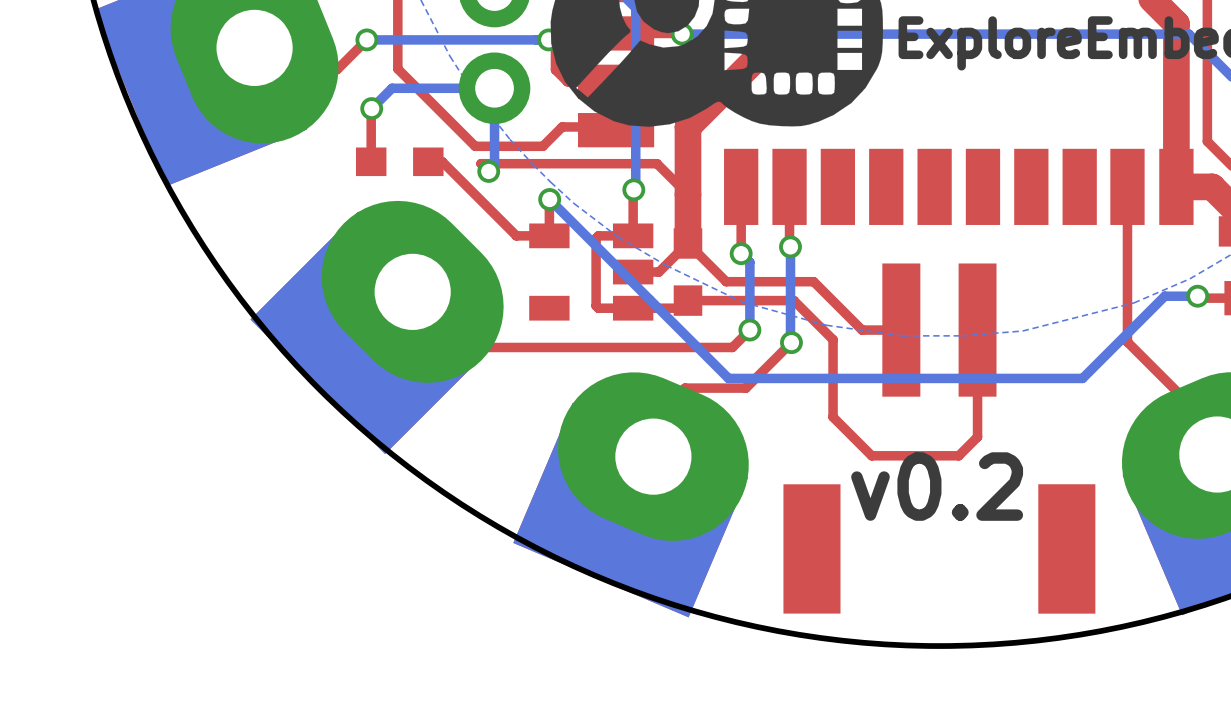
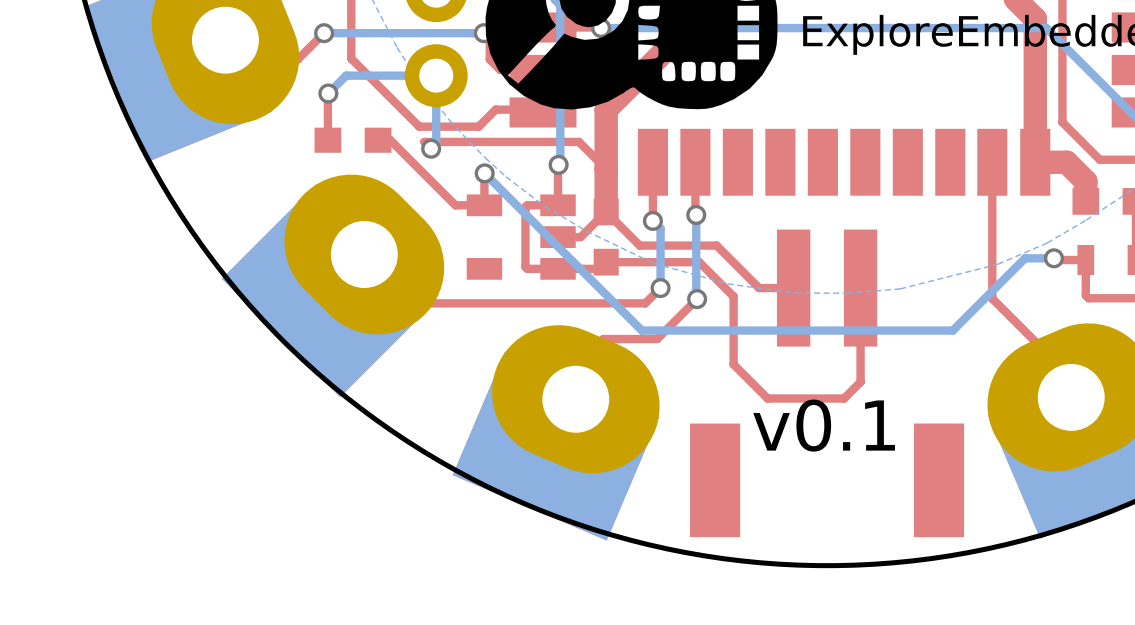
text: v0.2 (937, 486) -> v0.1 (824, 425)

